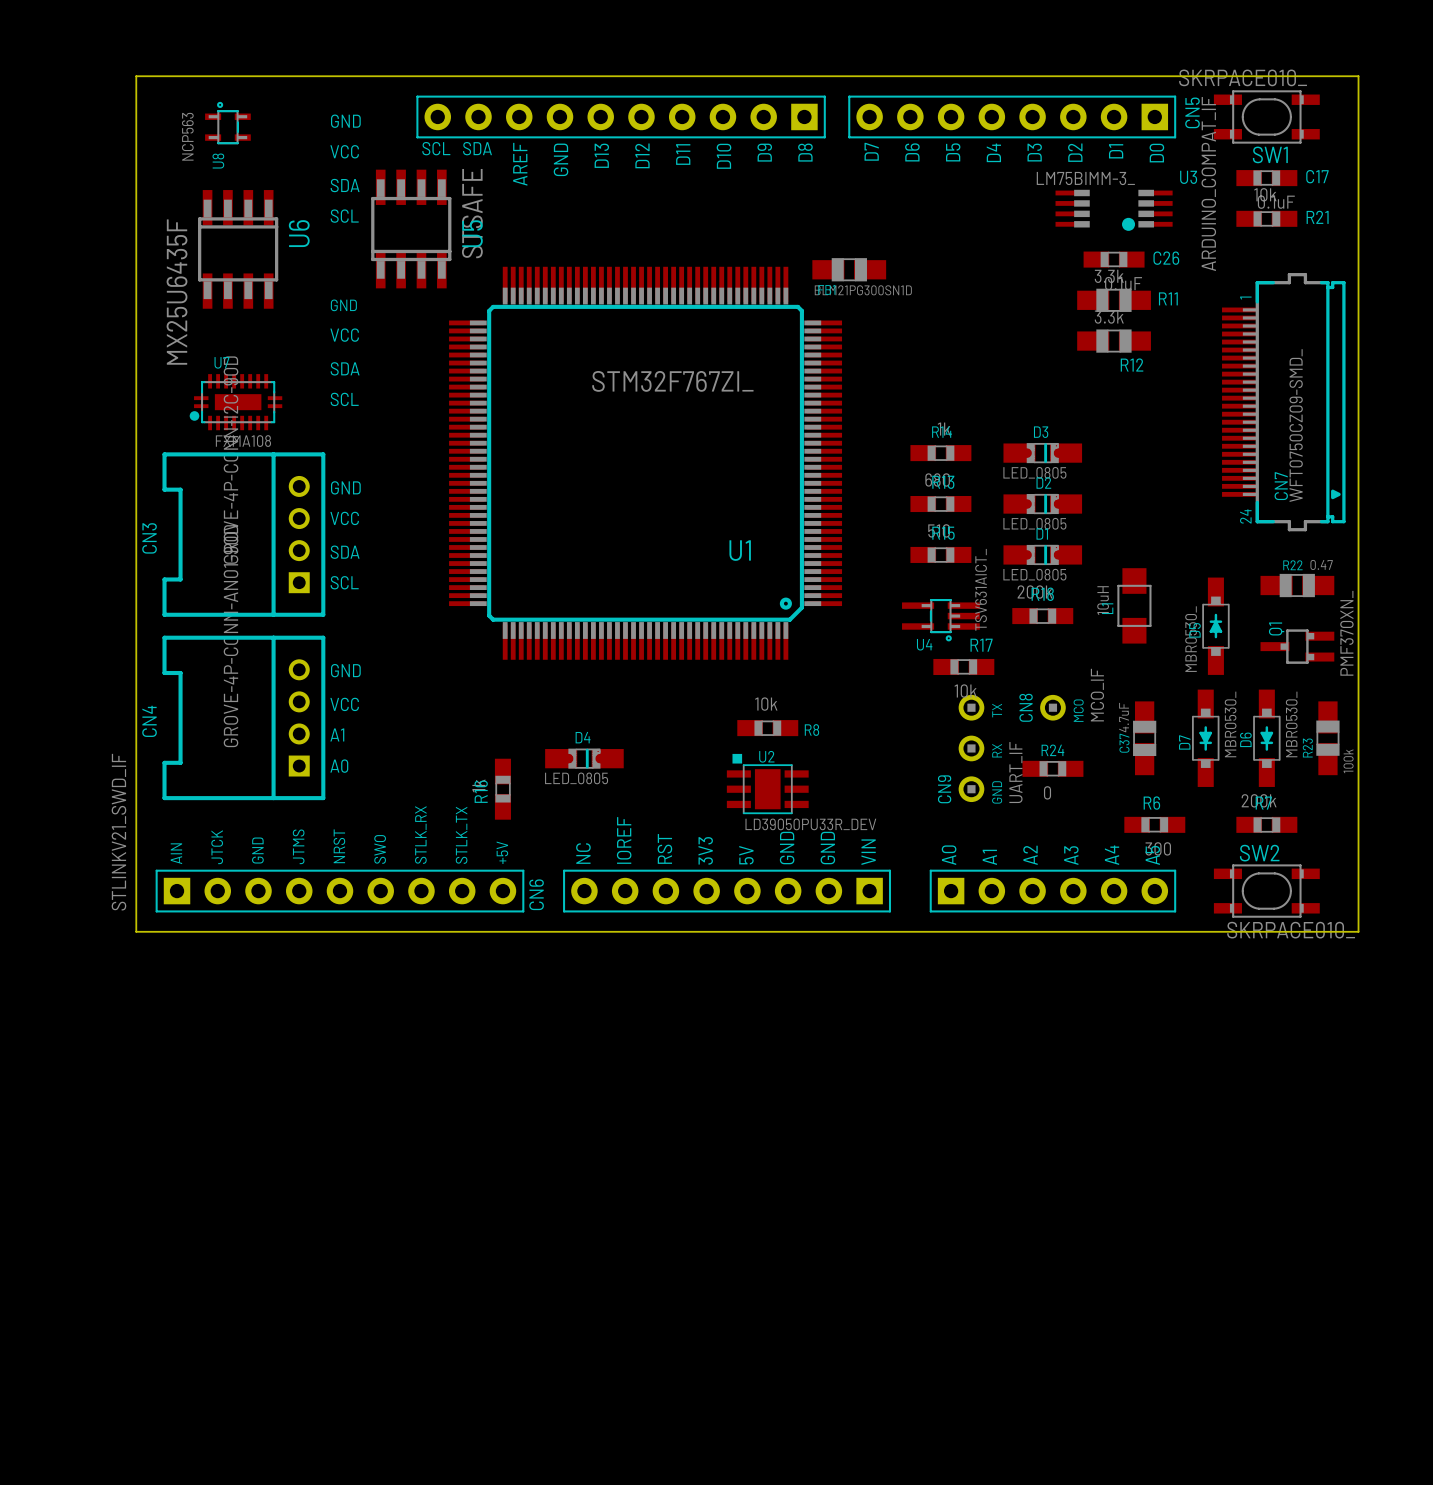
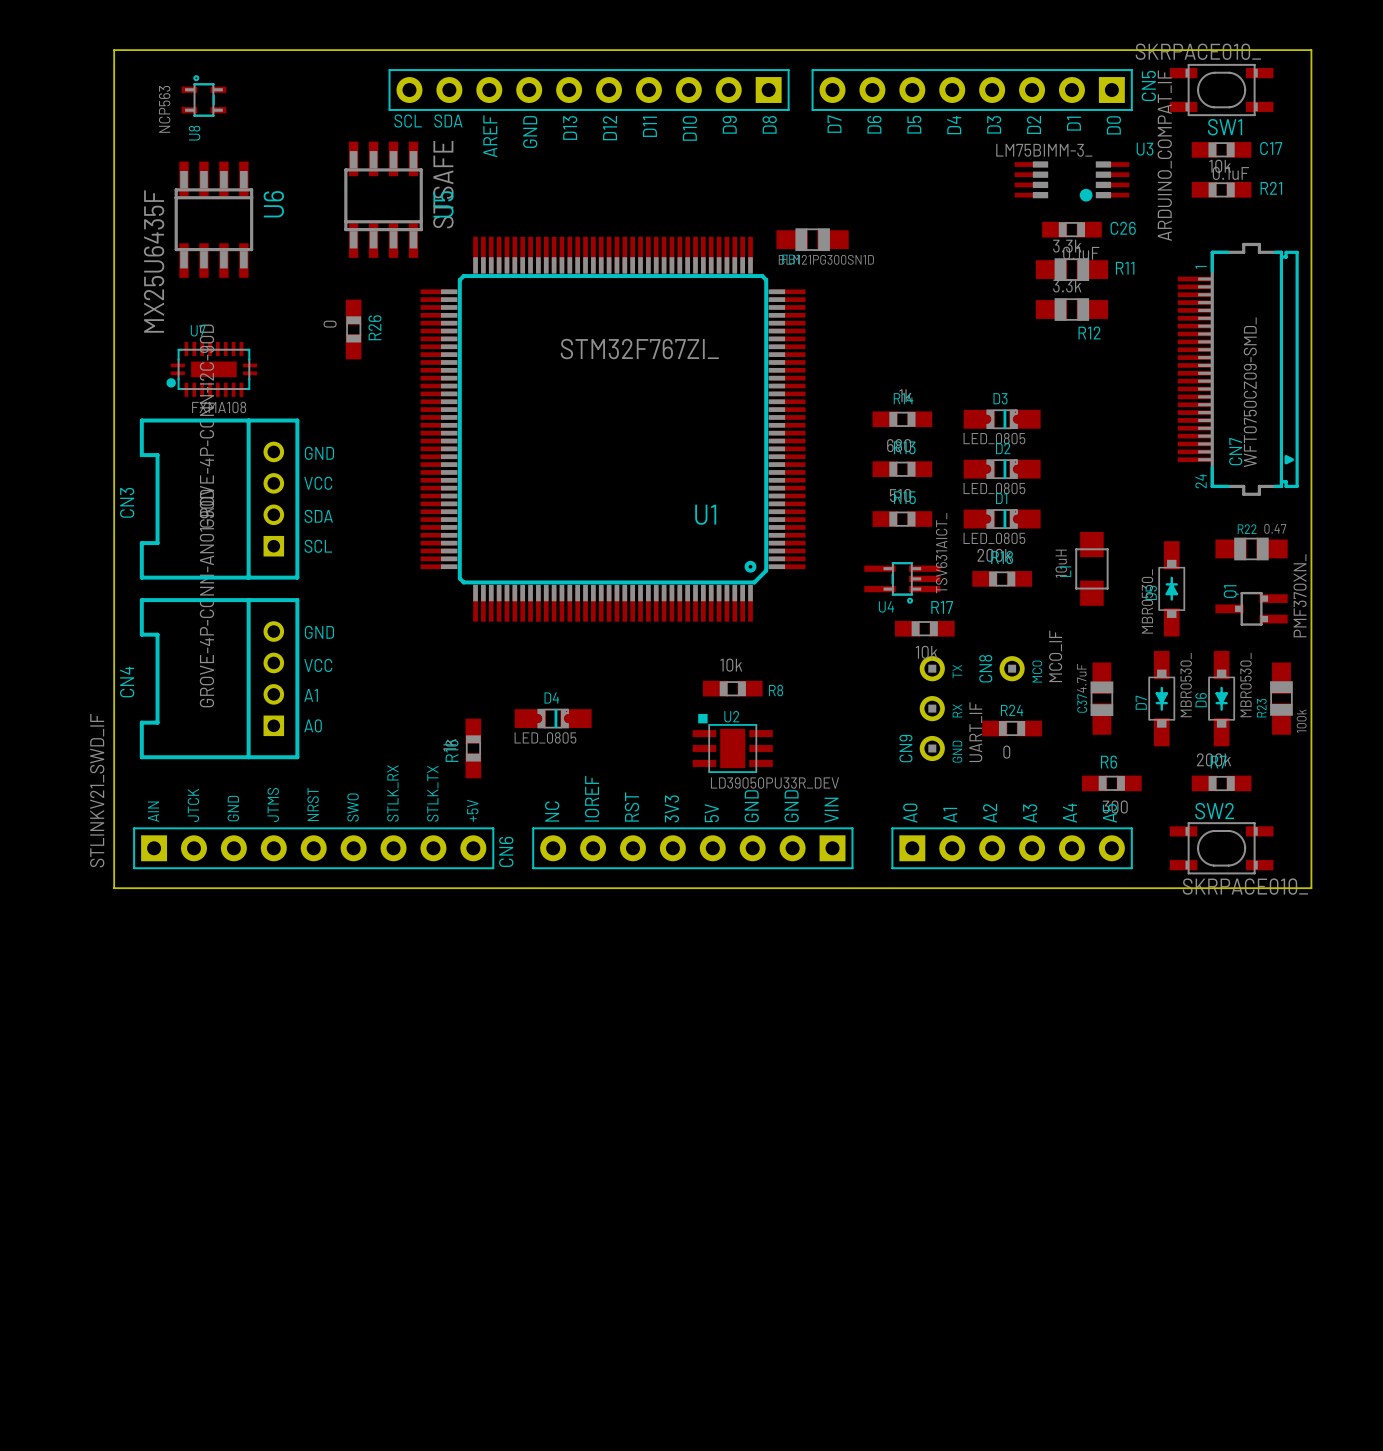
text: GND (345, 121) -> none
text: VCC (344, 151) -> none
text: SDA (345, 185) -> none
text: SCL (344, 216) -> none
text: GND (343, 305) -> none
text: VCC (344, 335) -> none
R26: none -> 0 (353, 329)
text: SDA (345, 368) -> none
text: SCL (344, 399) -> none

